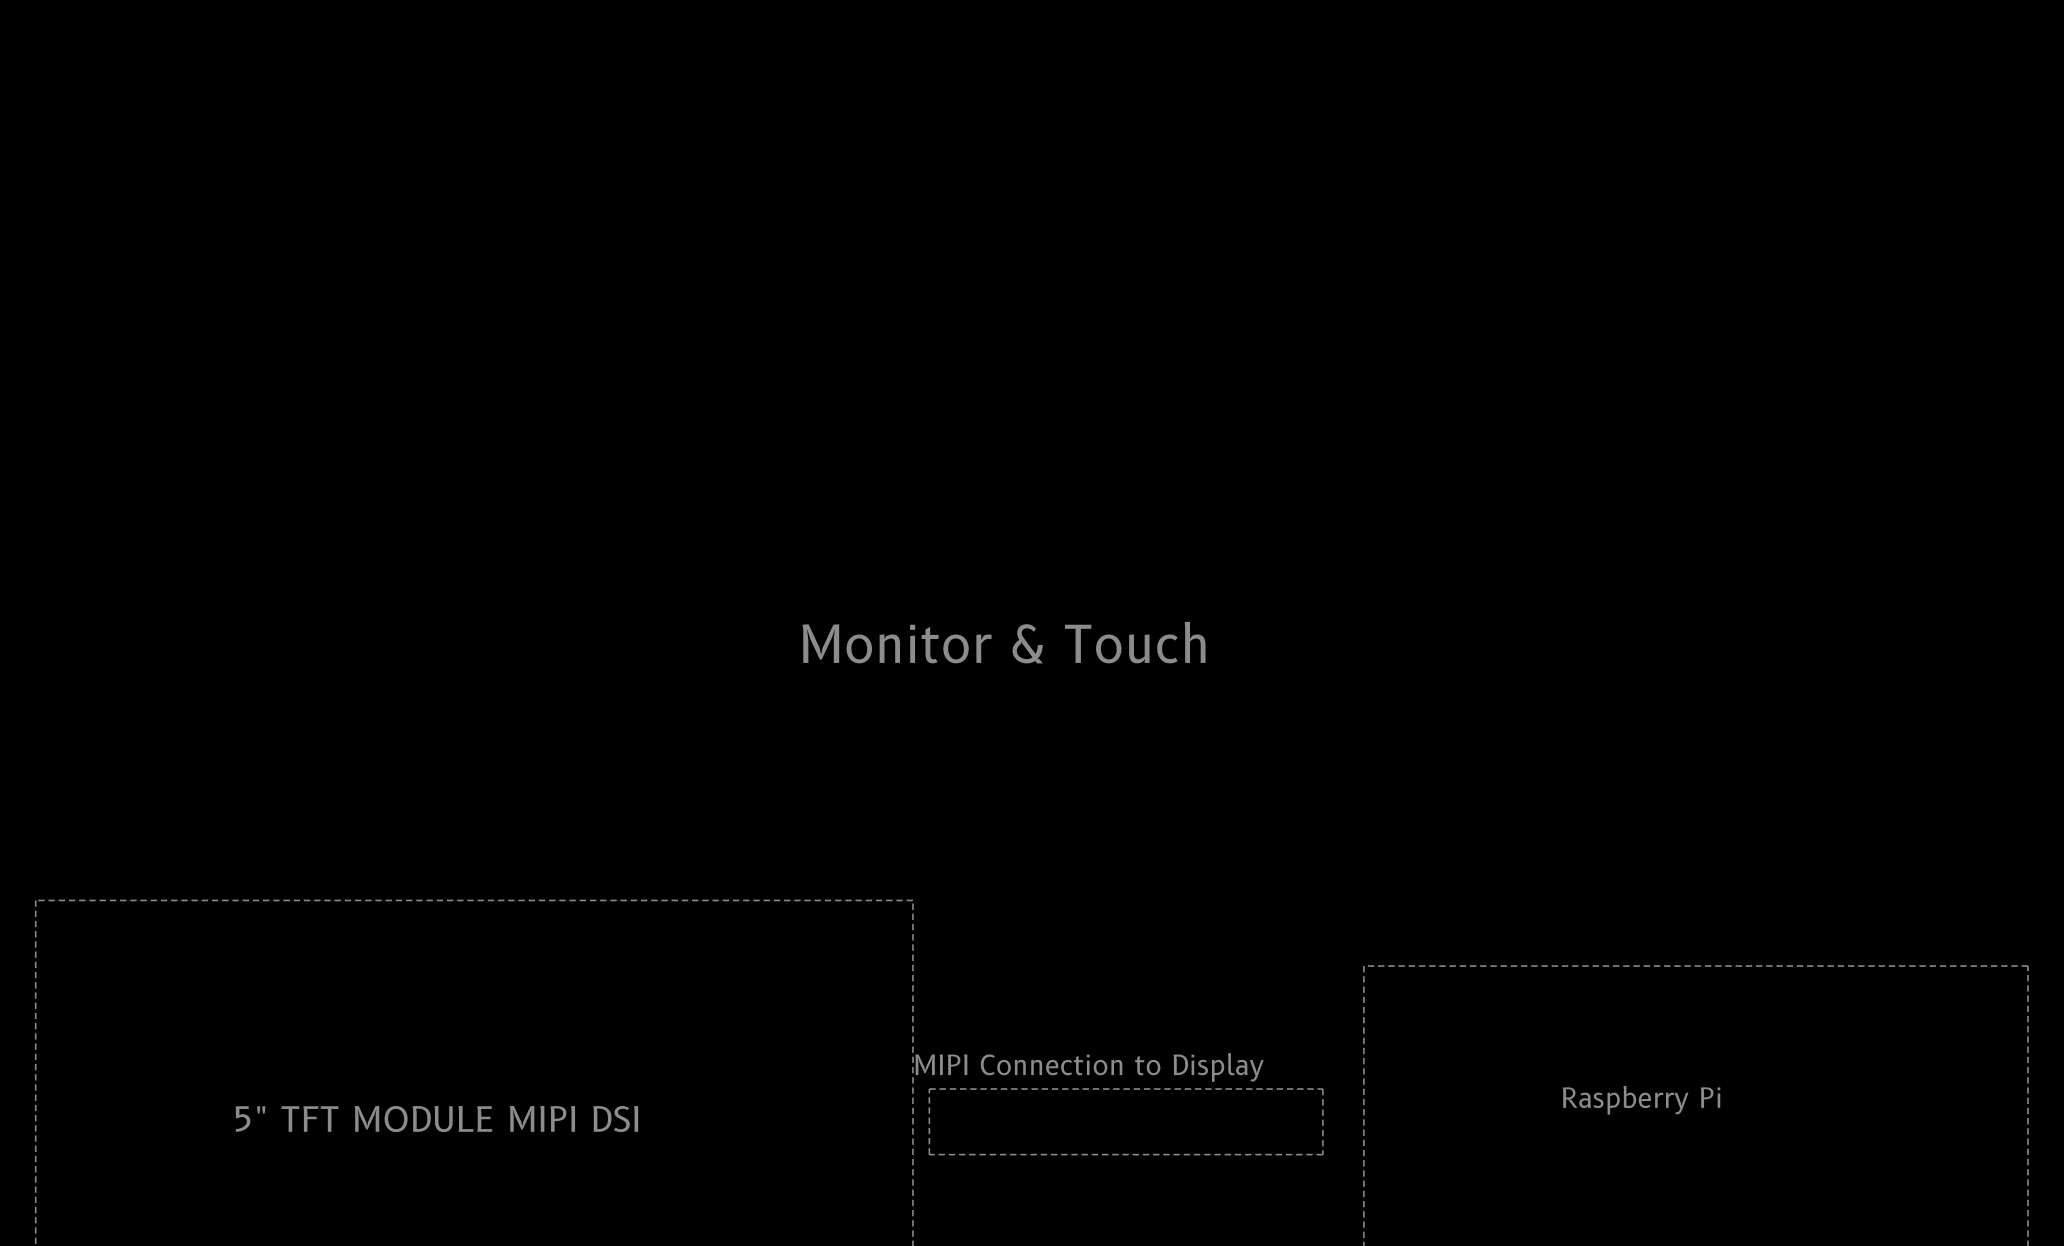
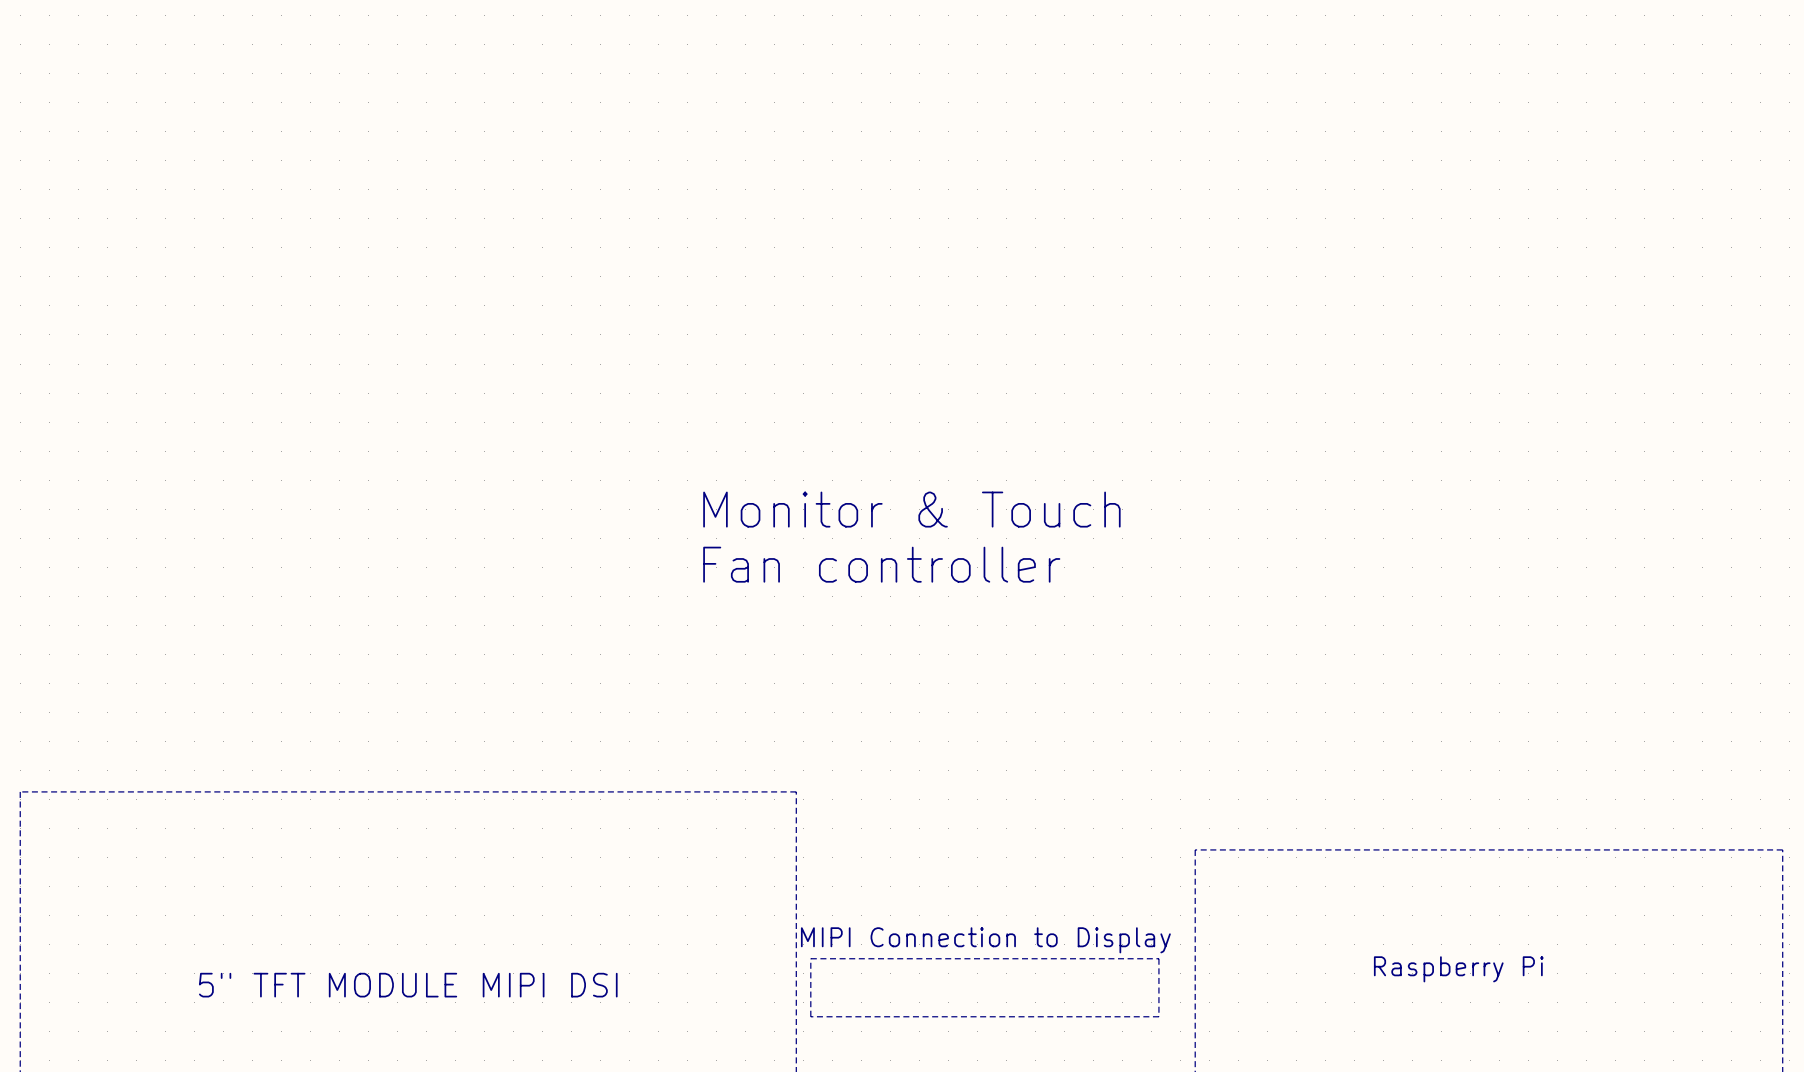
text: none -> Monitor & Touch (911, 509)
text: Monitor & Touch (1004, 642) -> Fan controller (881, 564)

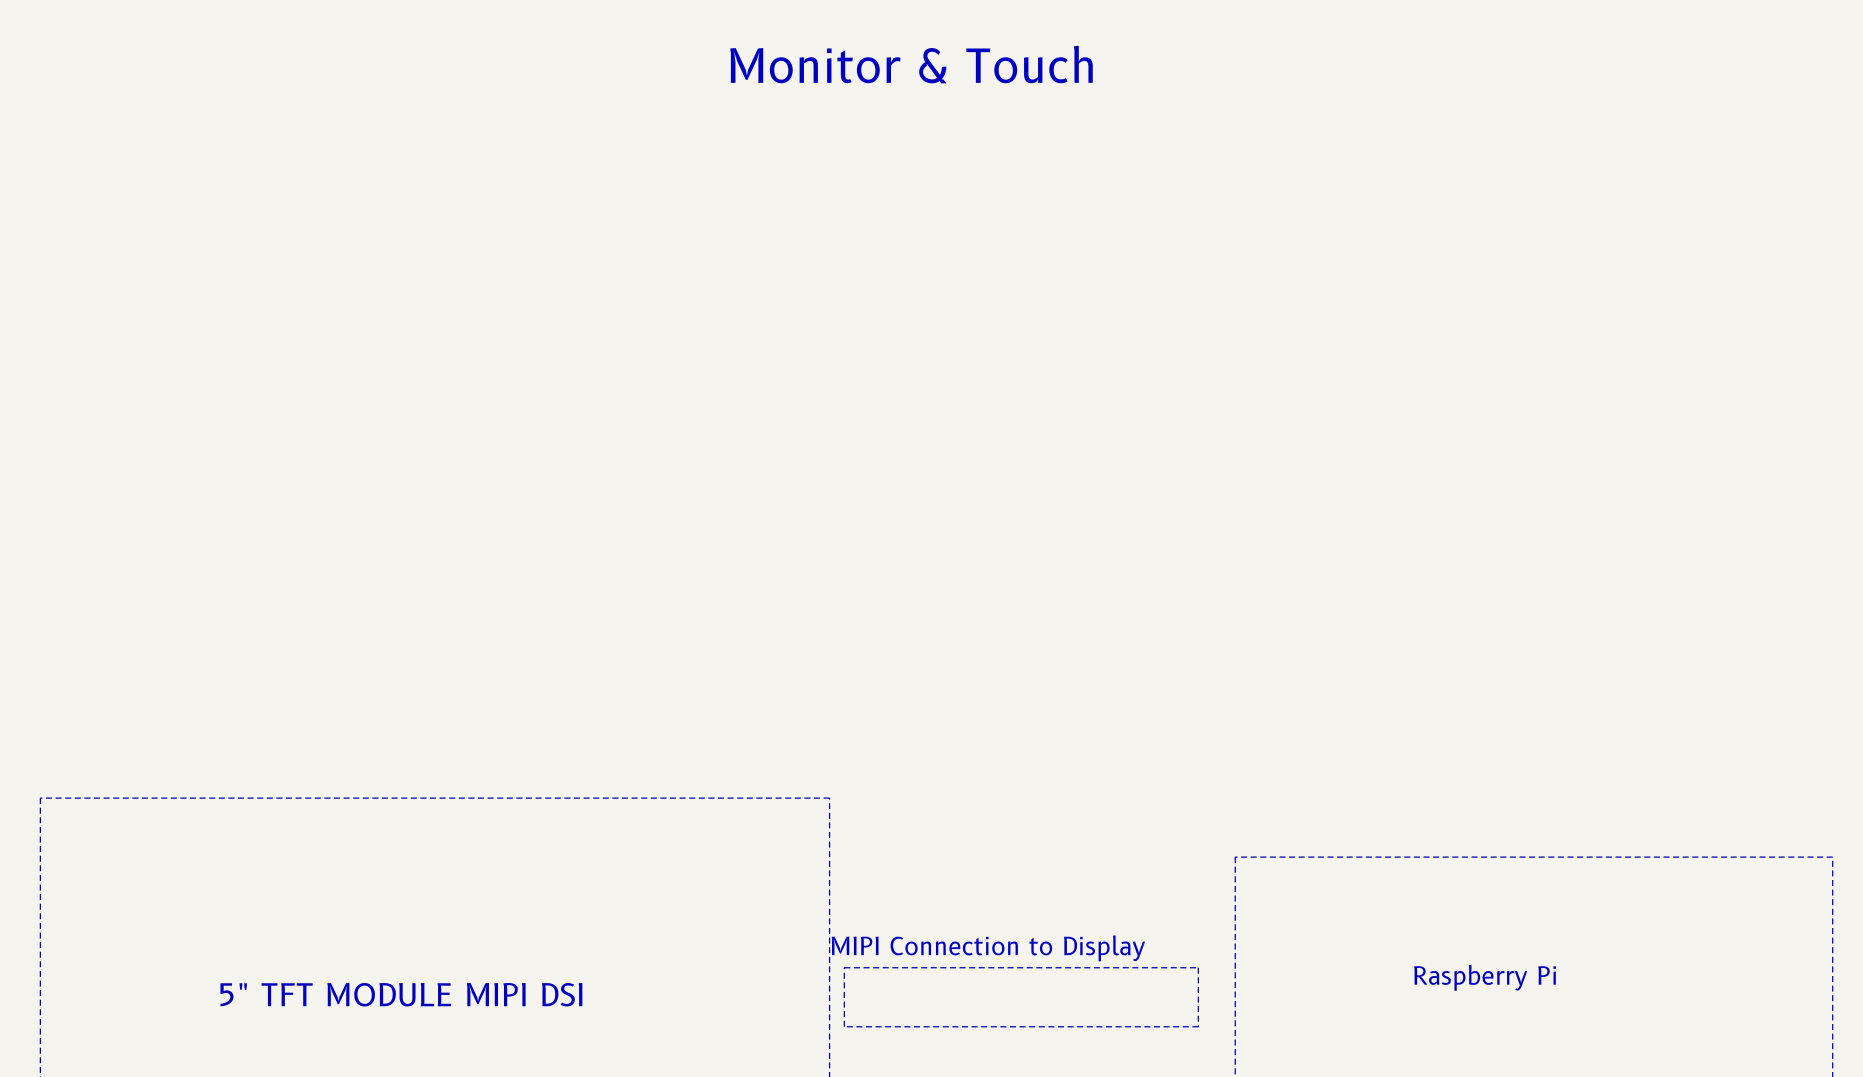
text: none -> Monitor & Touch (911, 64)
text: Monitor & Touch (911, 509) -> none
text: Fan controller (881, 564) -> none

